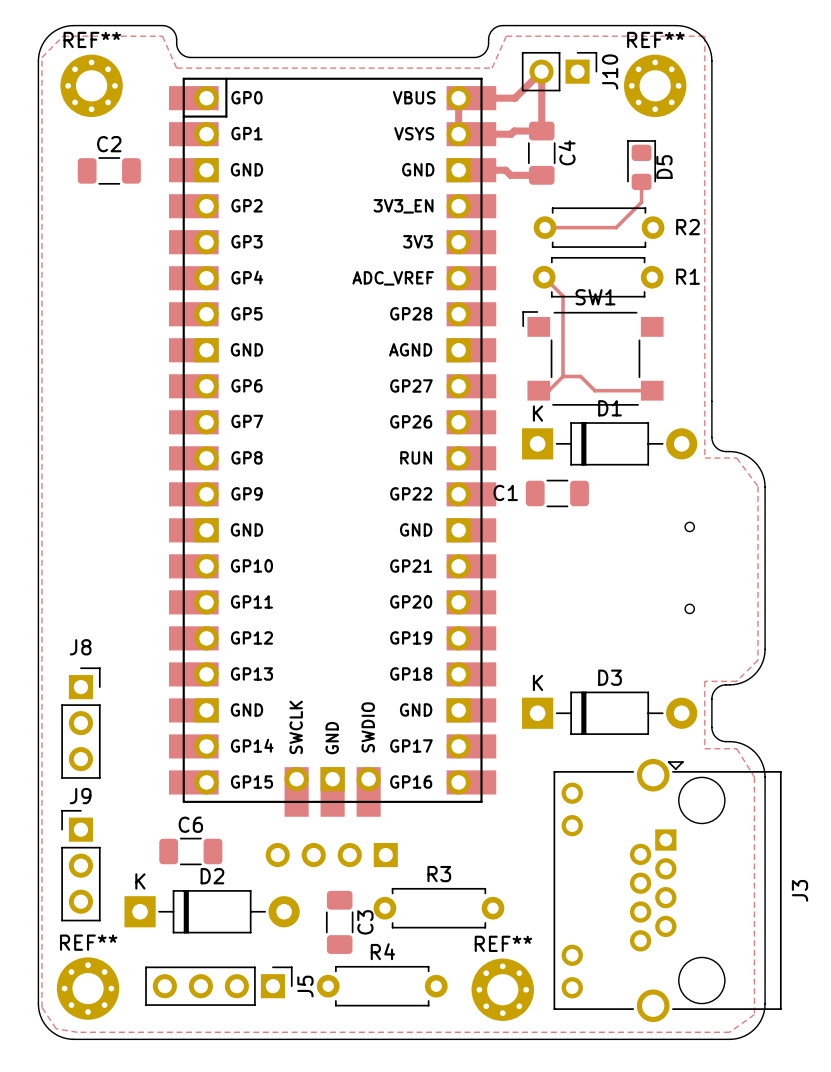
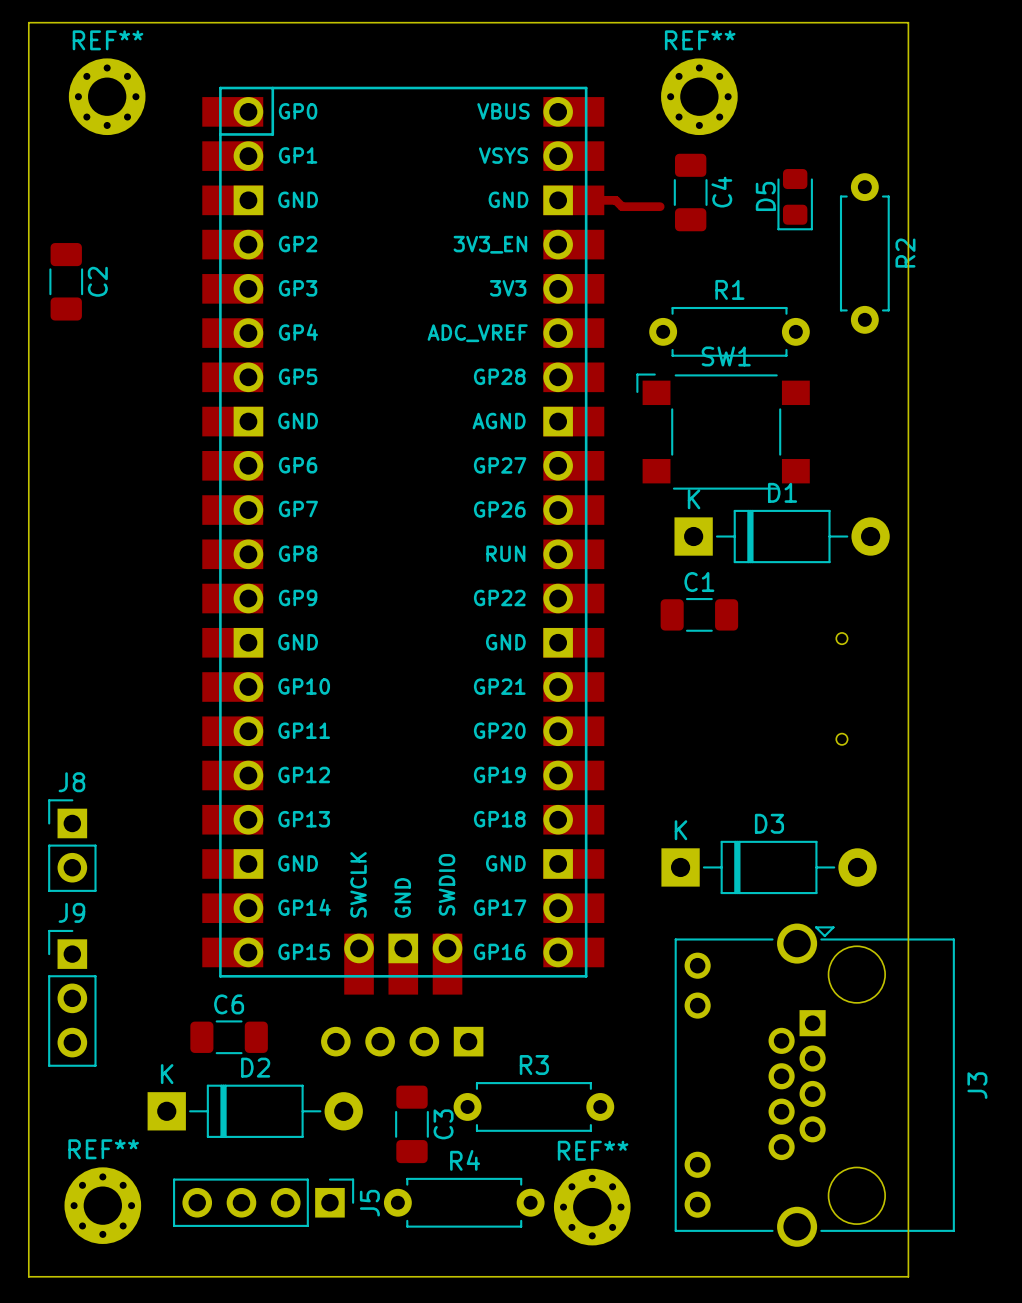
board edge: (73, 25) (58, 29) (48, 35) (41, 45) (38, 61) (38, 1003) (43, 1022) (58, 1035) (73, 1039) (729, 1039) (745, 1035) (754, 1028) (761, 1019) (764, 1007) (765, 777) (761, 761) (751, 749) (737, 742) (721, 740) (714, 734) (711, 727) (711, 697) (714, 691) (719, 686) (737, 684) (751, 677) (759, 668) (764, 657) (765, 487) (761, 471) (751, 459) (737, 452) (719, 450) (712, 440) (711, 57) (708, 45) (701, 35) (691, 29) (676, 25) -> (85, 22) (28, 22) (28, 1276) (908, 1276) (908, 22) (825, 22)
board edge: (162, 25) (173, 30) (178, 50) (183, 55) (190, 57) (475, 57) (486, 50) (491, 30) (502, 25) -> (194, 22) (612, 22)
zone outline: (63, 36) (162, 36) (176, 68) (492, 68) (506, 36) (704, 36) (704, 458) (736, 458) (757, 486) (757, 660) (736, 681) (704, 681) (704, 748) (736, 748) (754, 777) (754, 1014) (729, 1032) (77, 1032) (56, 1028) (41, 1007) (41, 57) (63, 36) -> none
track: (541, 71) (515, 98) (458, 98) (458, 134) (511, 134) (514, 131) (541, 131) (541, 71) -> none
J10: (559, 71) -> none
REF** position: (655, 85) -> (699, 96)
C4 position: (541, 153) -> (690, 192)
D5 rotation: 0° (641, 165) -> 180° (795, 199)
C2 rotation: 0° (109, 170) -> 90° clockwise (66, 281)
C2 position: (109, 170) -> (66, 281)
track: (641, 181) (641, 202) (616, 227) (545, 227) -> none
R2 rotation: 0° (599, 227) -> 90° clockwise (864, 253)
R2 position: (599, 227) -> (864, 253)
R2 name position: R2 (687, 227) -> R2 (905, 253)
R1 name position: R1 (687, 276) -> R1 (729, 289)
track: (544, 277) (563, 296) (563, 376) -> none
track: (563, 376) (580, 376) (594, 390) (652, 390) -> none
track: (563, 376) (548, 390) (538, 390) -> none
D1 position: (609, 443) -> (782, 536)
C1 name position: C1 (505, 492) -> C1 (699, 582)
C1 position: (557, 493) -> (699, 614)
J8 footprint: [61, 667, 101, 779] -> [48, 799, 97, 892]
D3 position: (609, 713) -> (769, 867)
J9 position: (80, 865) -> (72, 998)
REF** position: (502, 989) -> (592, 1207)

